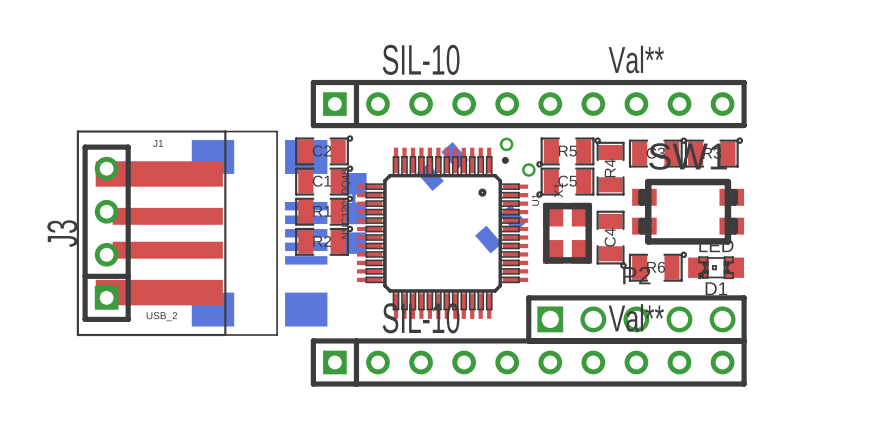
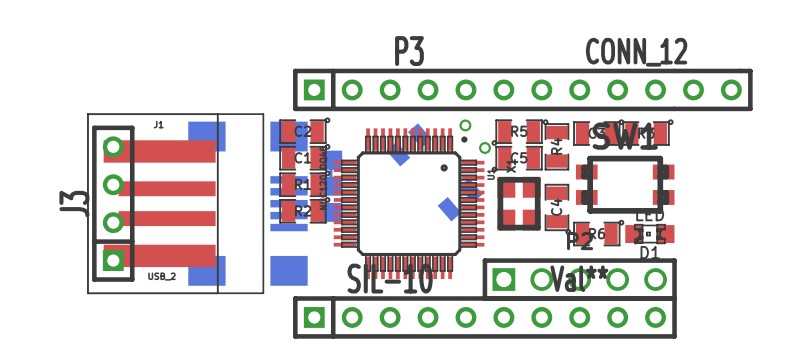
SIL-10: Val** (528, 104) -> none
P3: none -> CONN_12 (522, 89)

